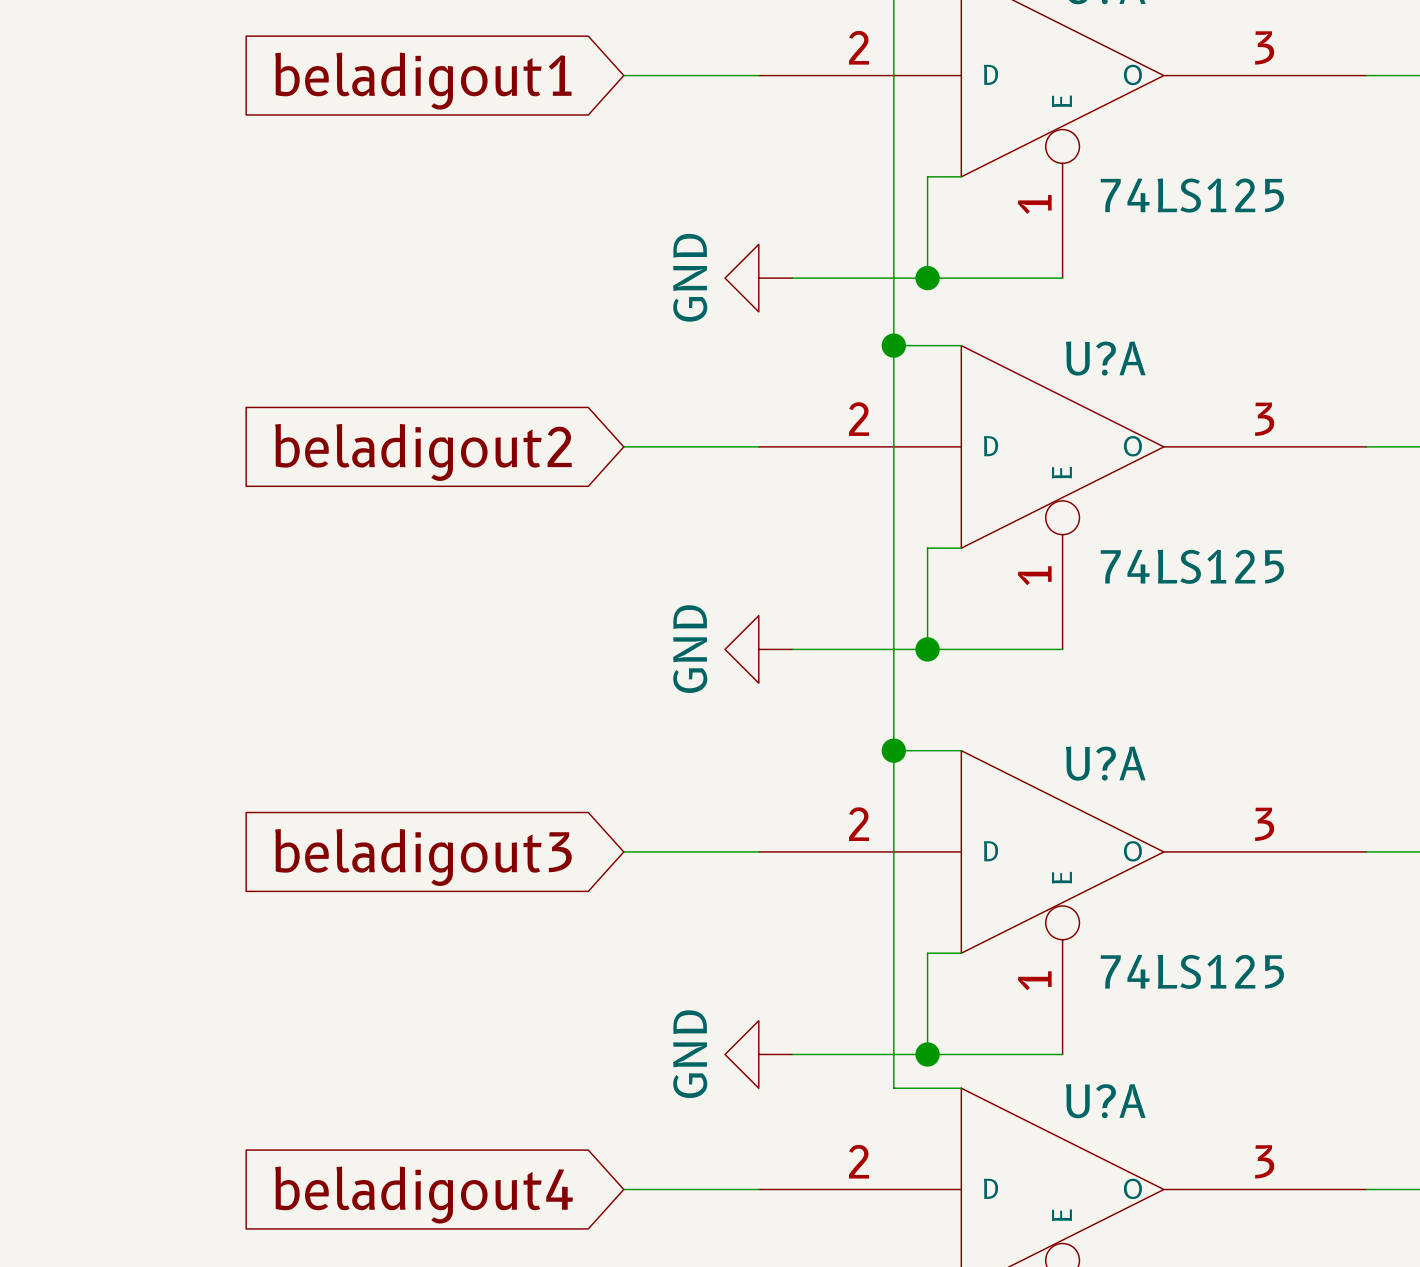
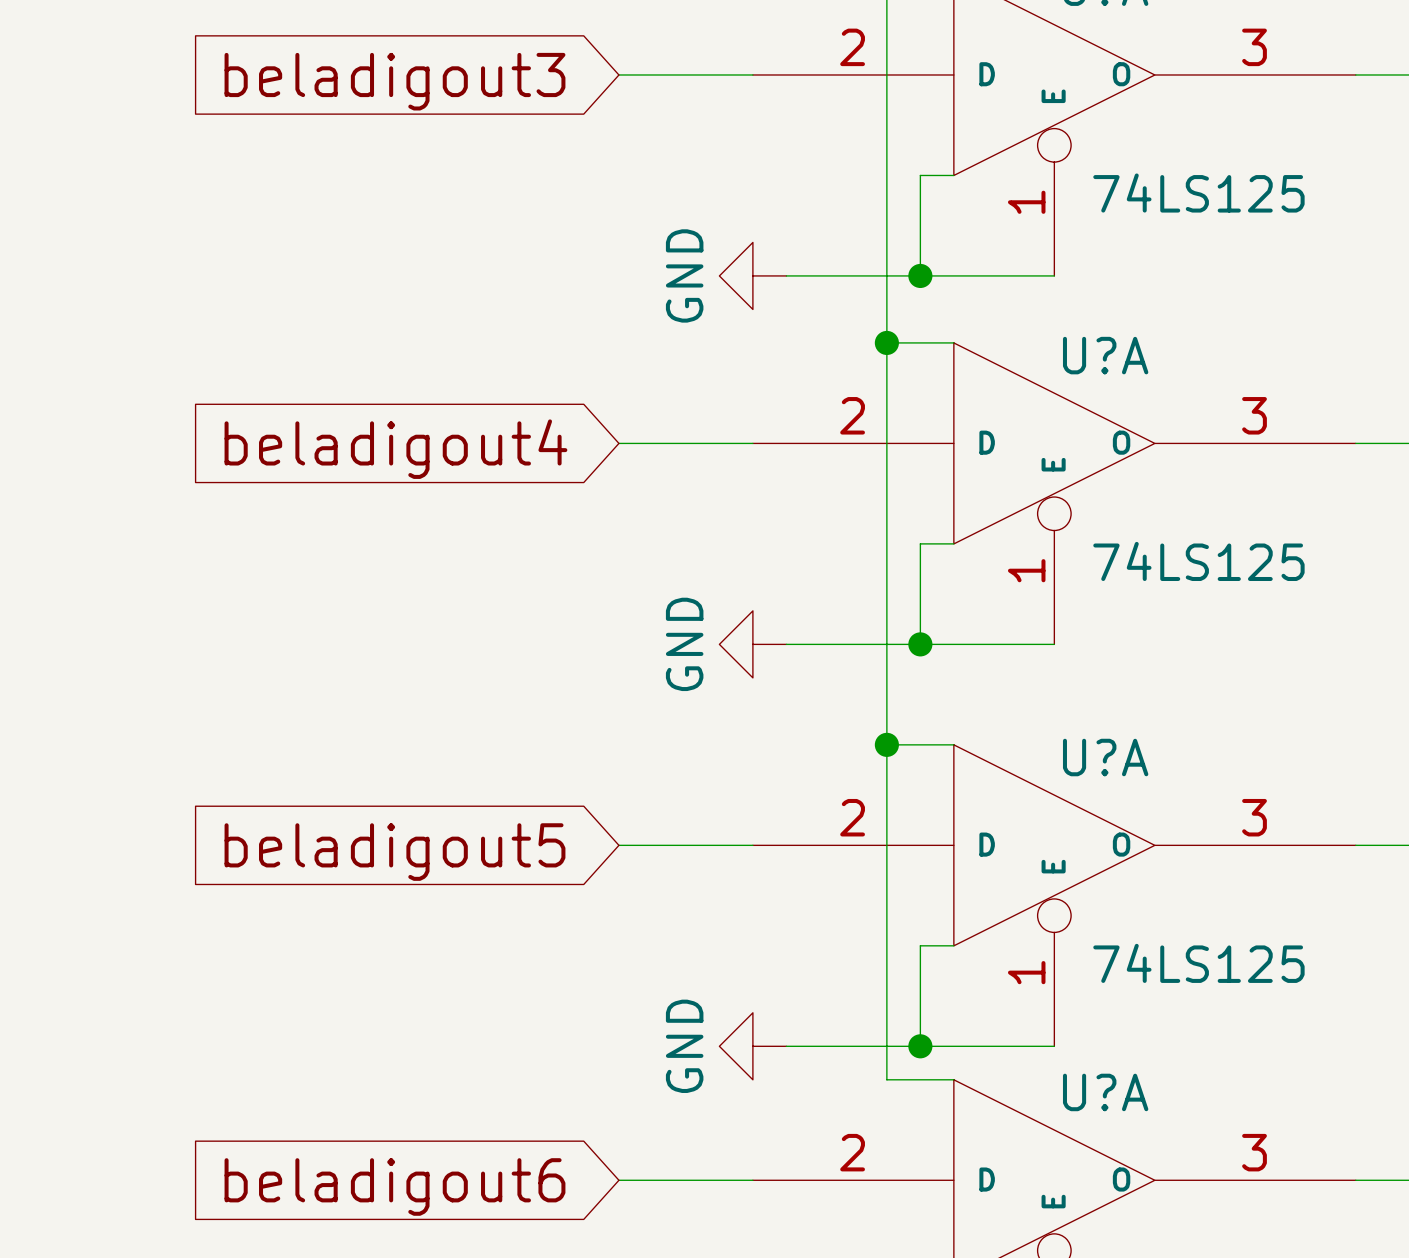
global label: beladigout1 (423, 81) -> beladigout3 (394, 81)
global label: beladigout2 (423, 452) -> beladigout4 (395, 449)
global label: beladigout3 (423, 857) -> beladigout5 (394, 852)
global label: beladigout4 (424, 1195) -> beladigout6 (394, 1186)

